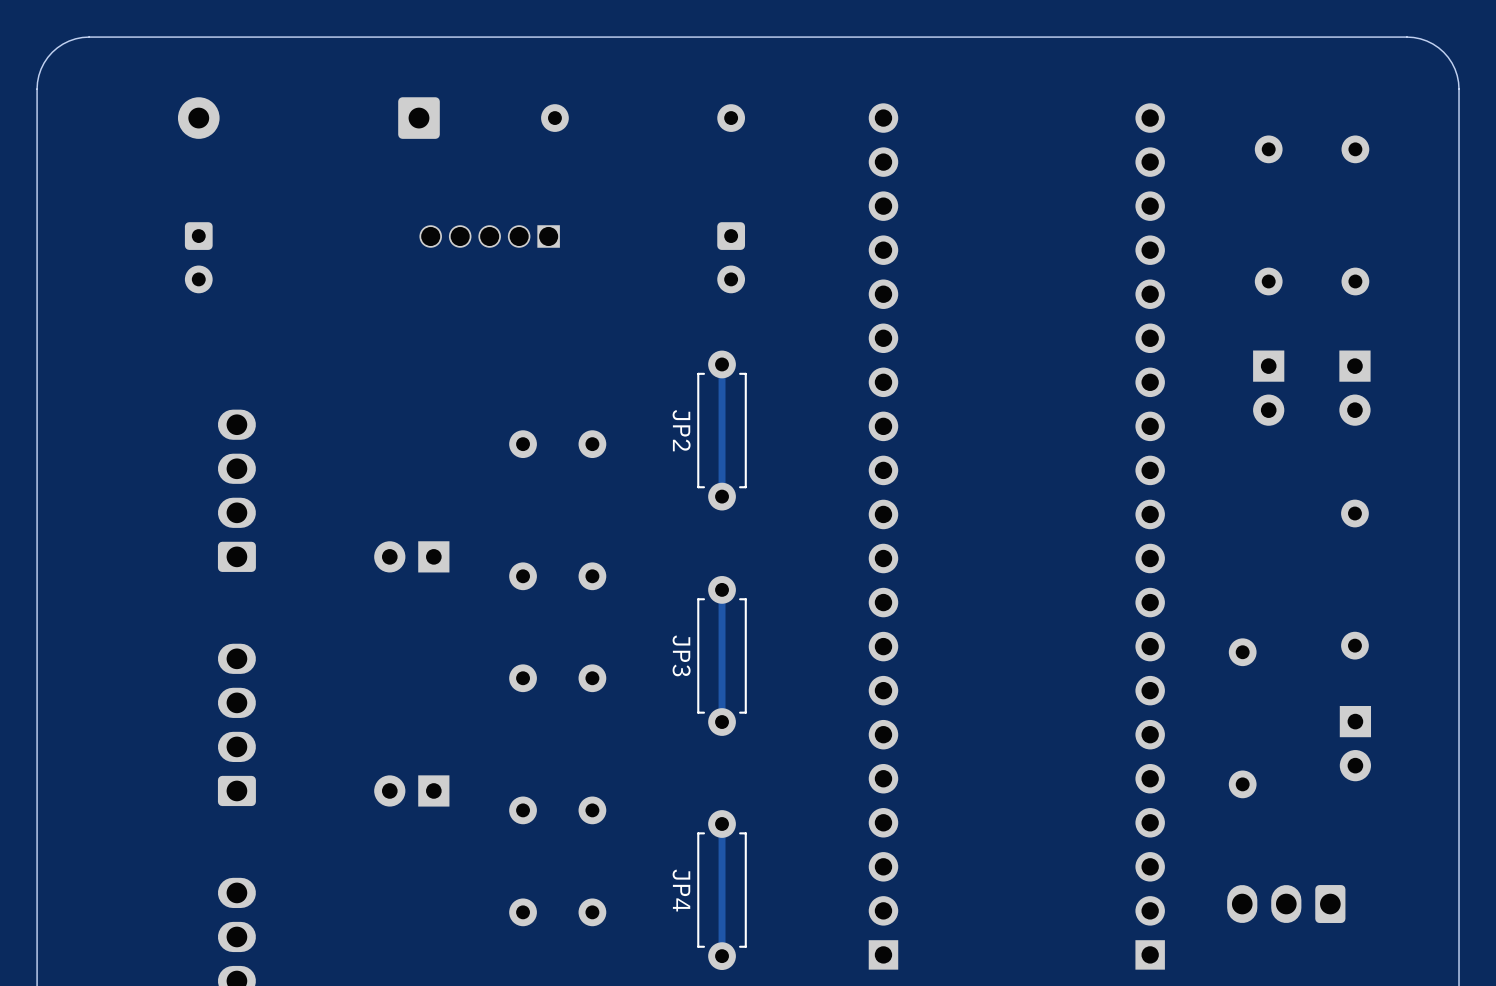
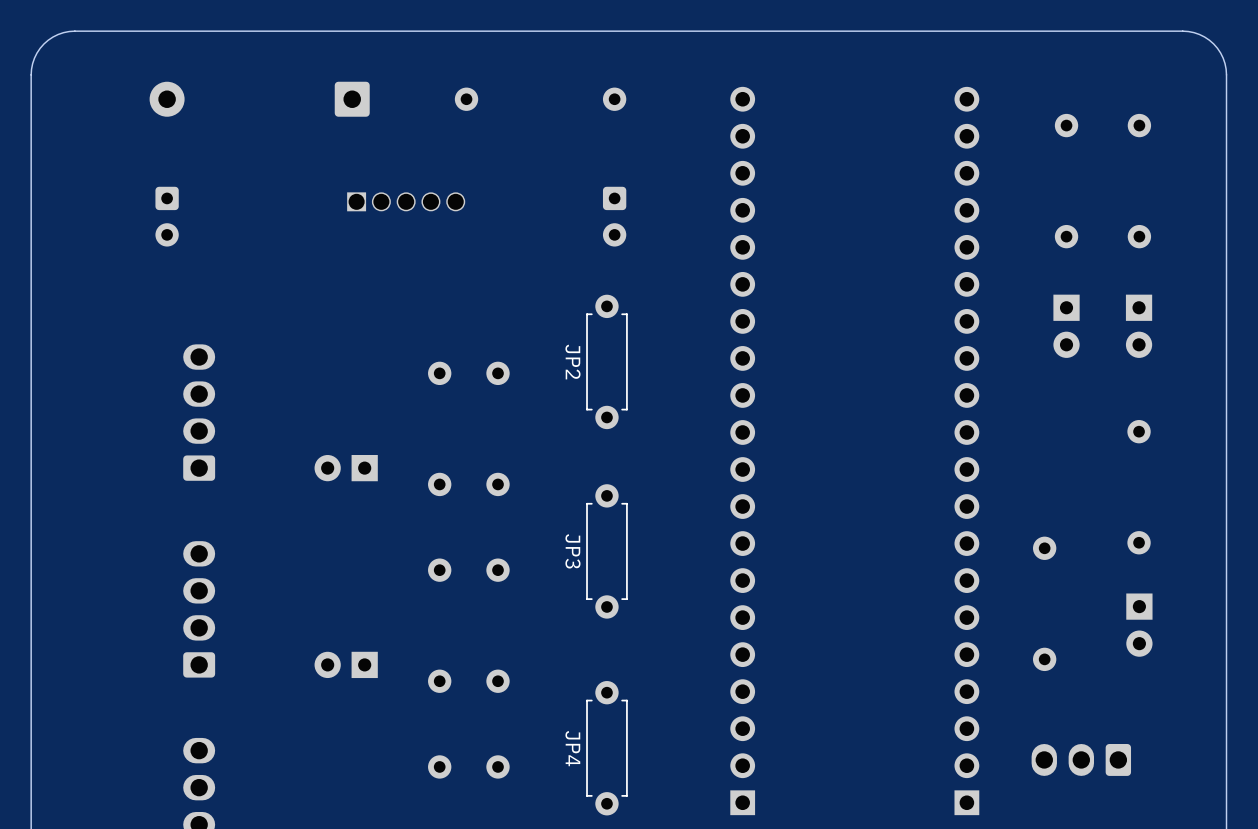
part rotation: 0° (489, 236) -> 180° (406, 201)
track: (722, 364) (722, 496) -> none
track: (722, 589) (722, 722) -> none
track: (722, 823) (722, 956) -> none

